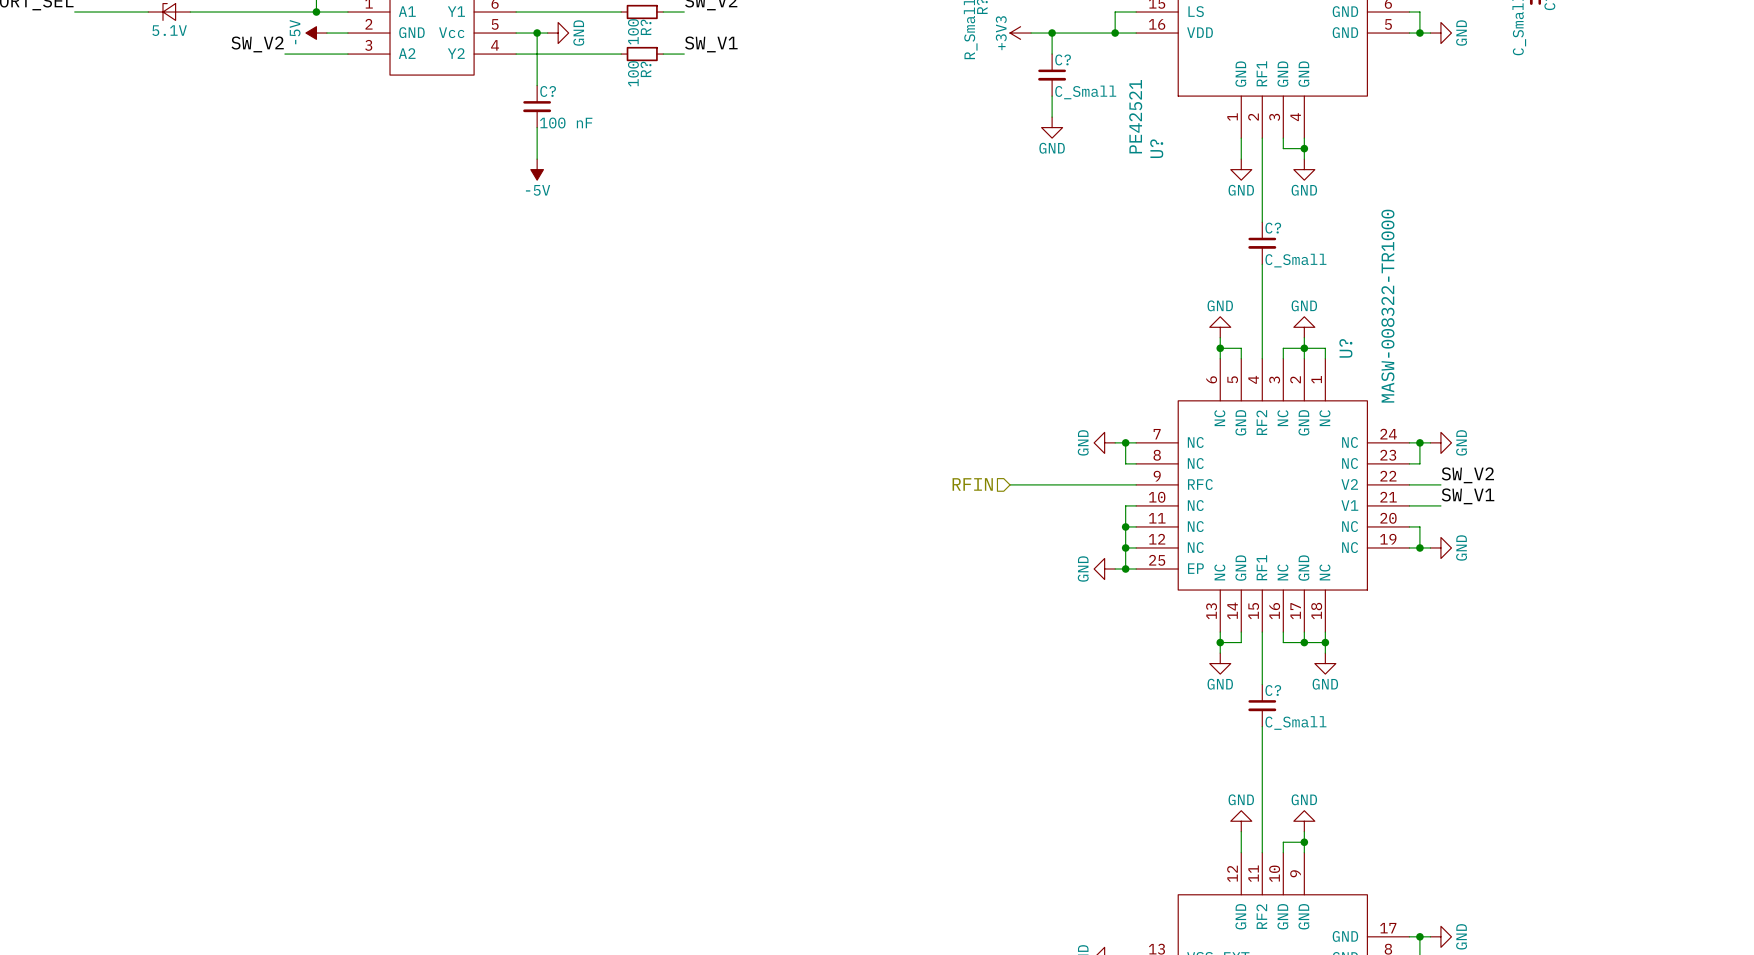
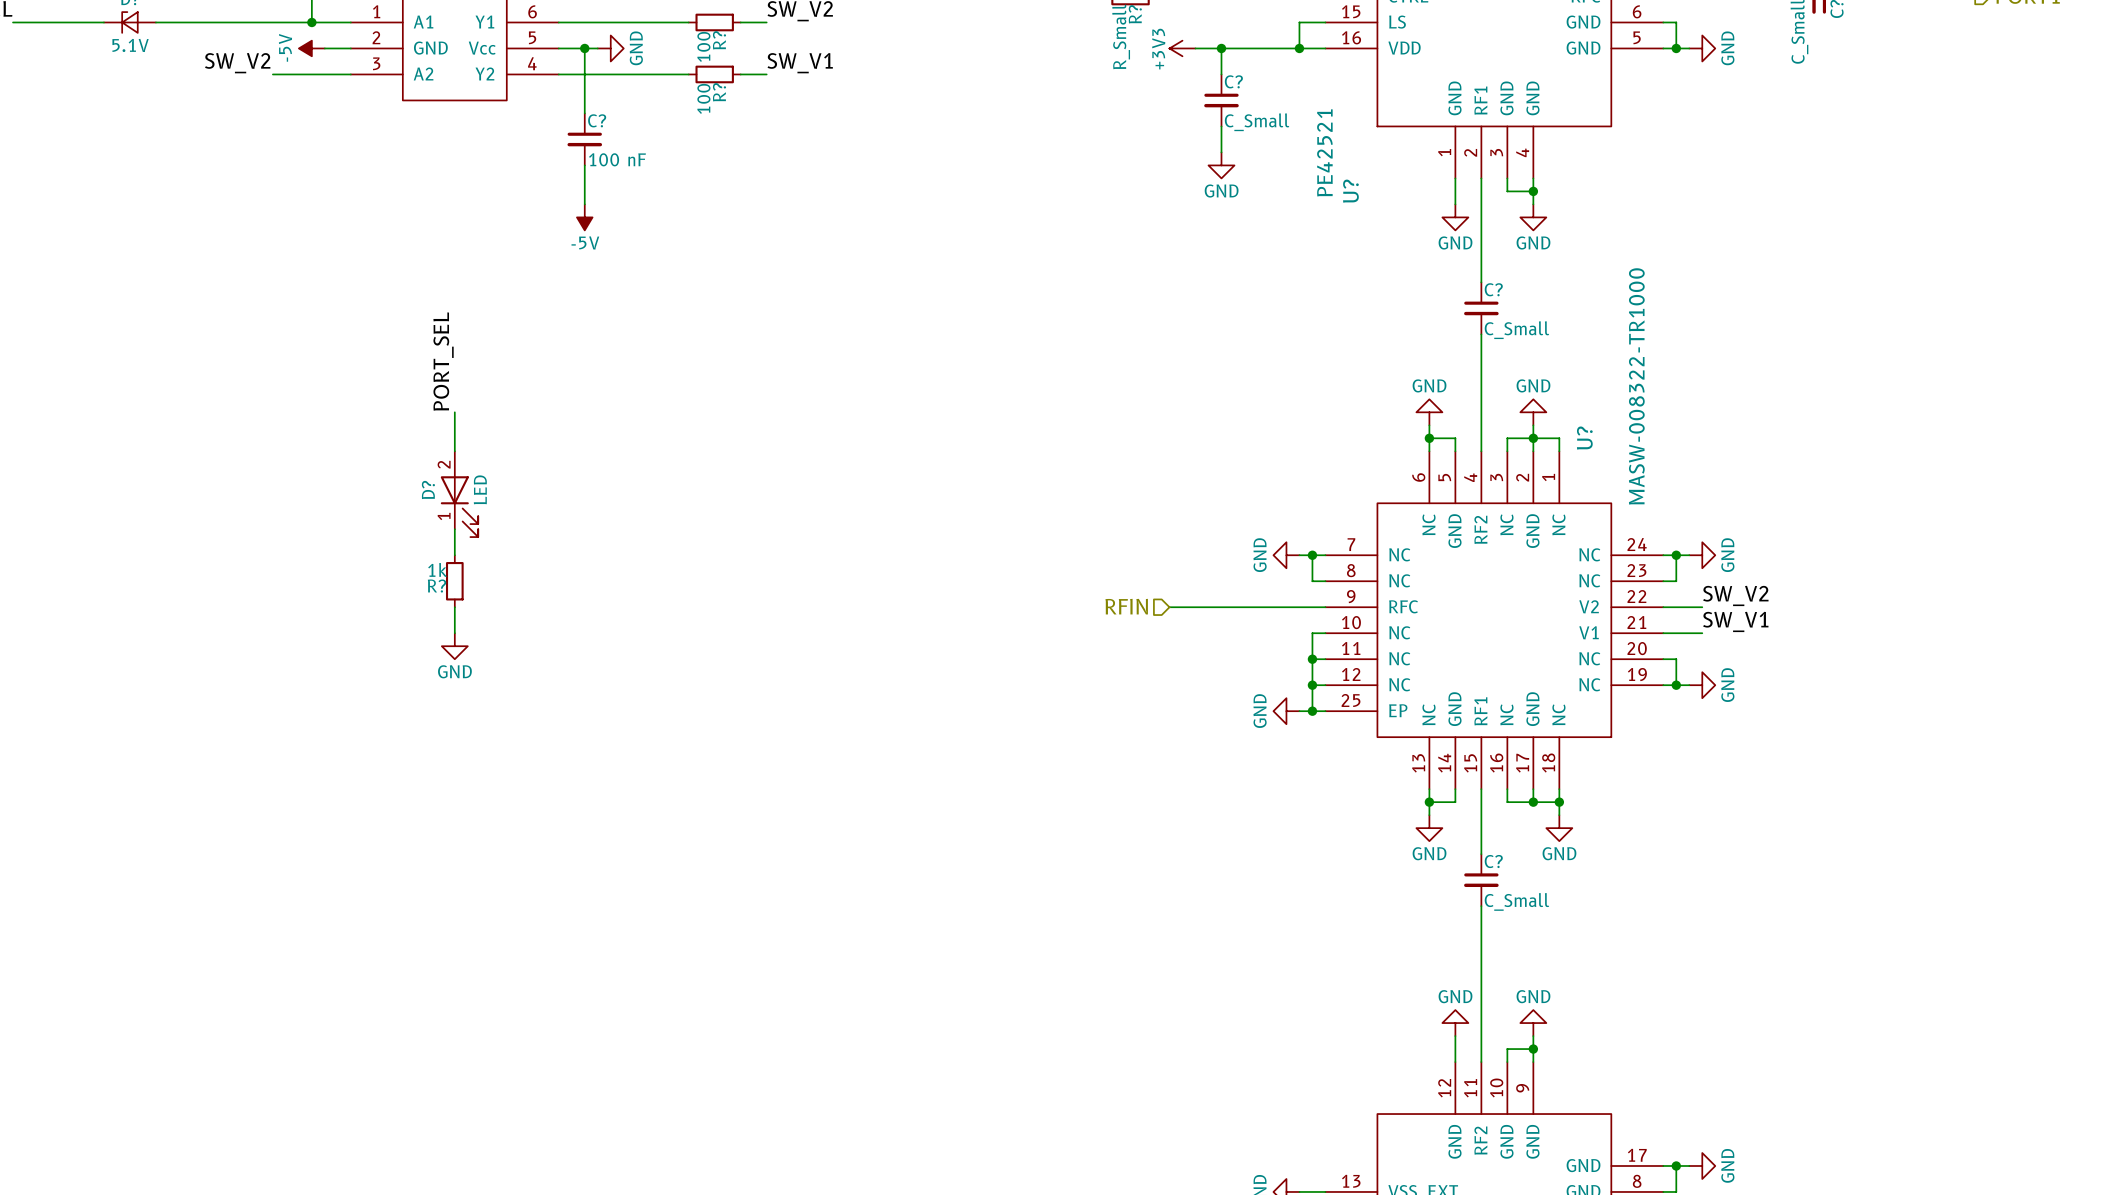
label: none -> PORT_SEL (443, 361)
wire: none -> (454, 412) (454, 451)
D?: none -> LED (459, 494)
wire: none -> (454, 529) (454, 555)
R?: none -> 1k (454, 581)
wire: none -> (454, 607) (454, 633)
power symbol: none -> GND (454, 646)

